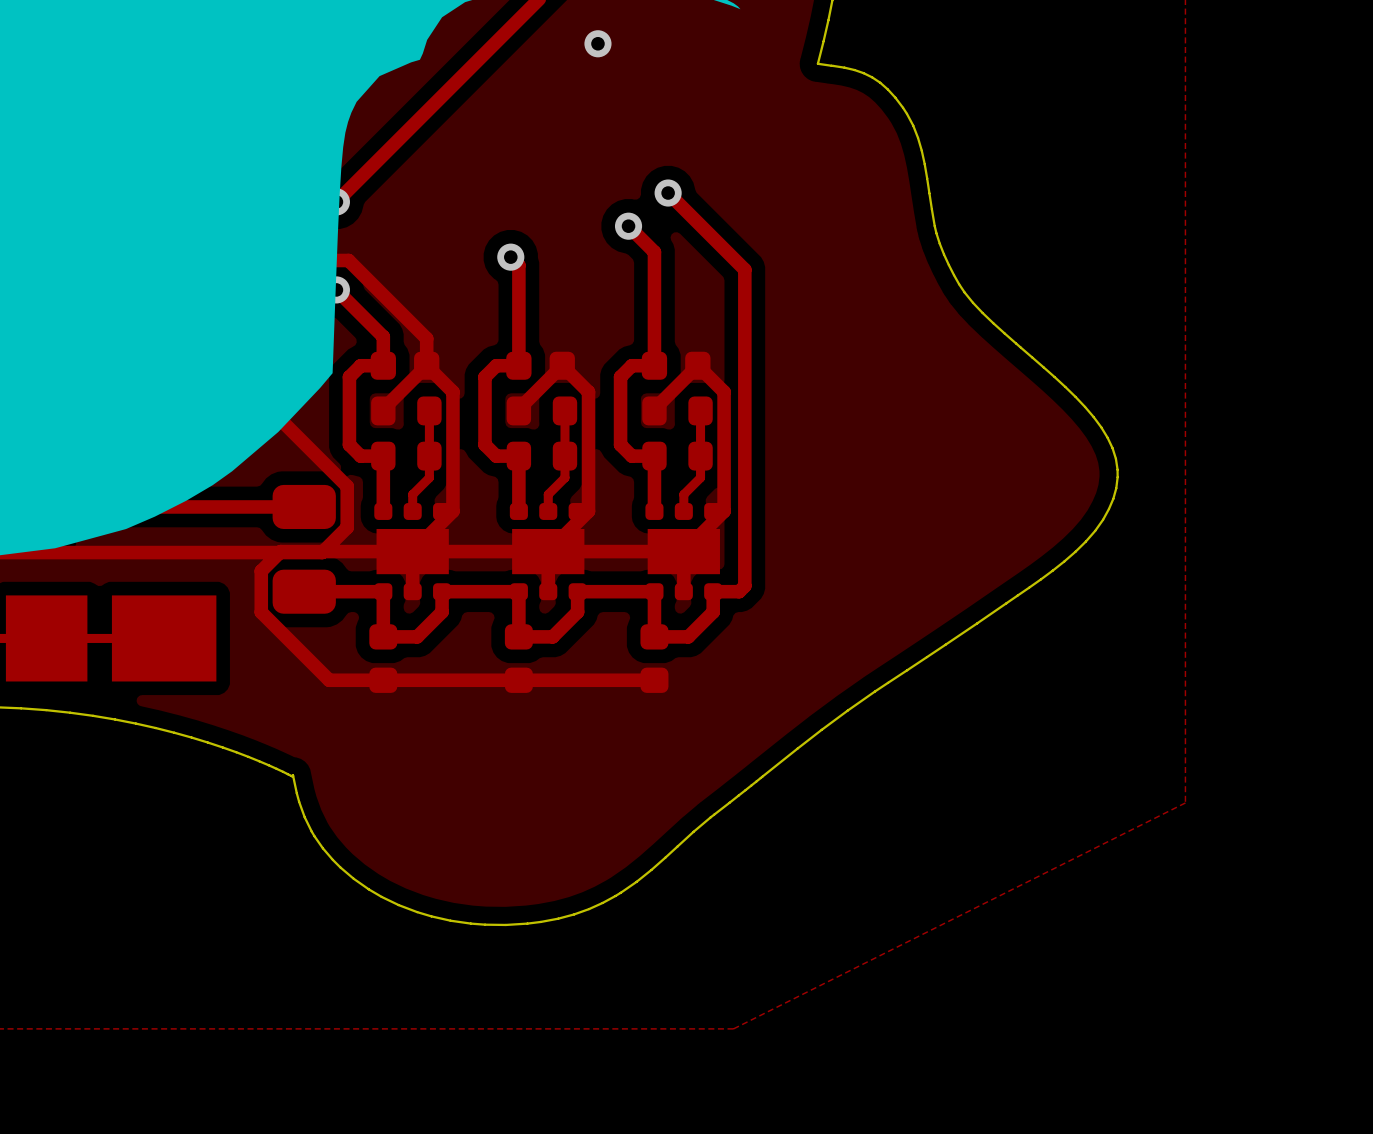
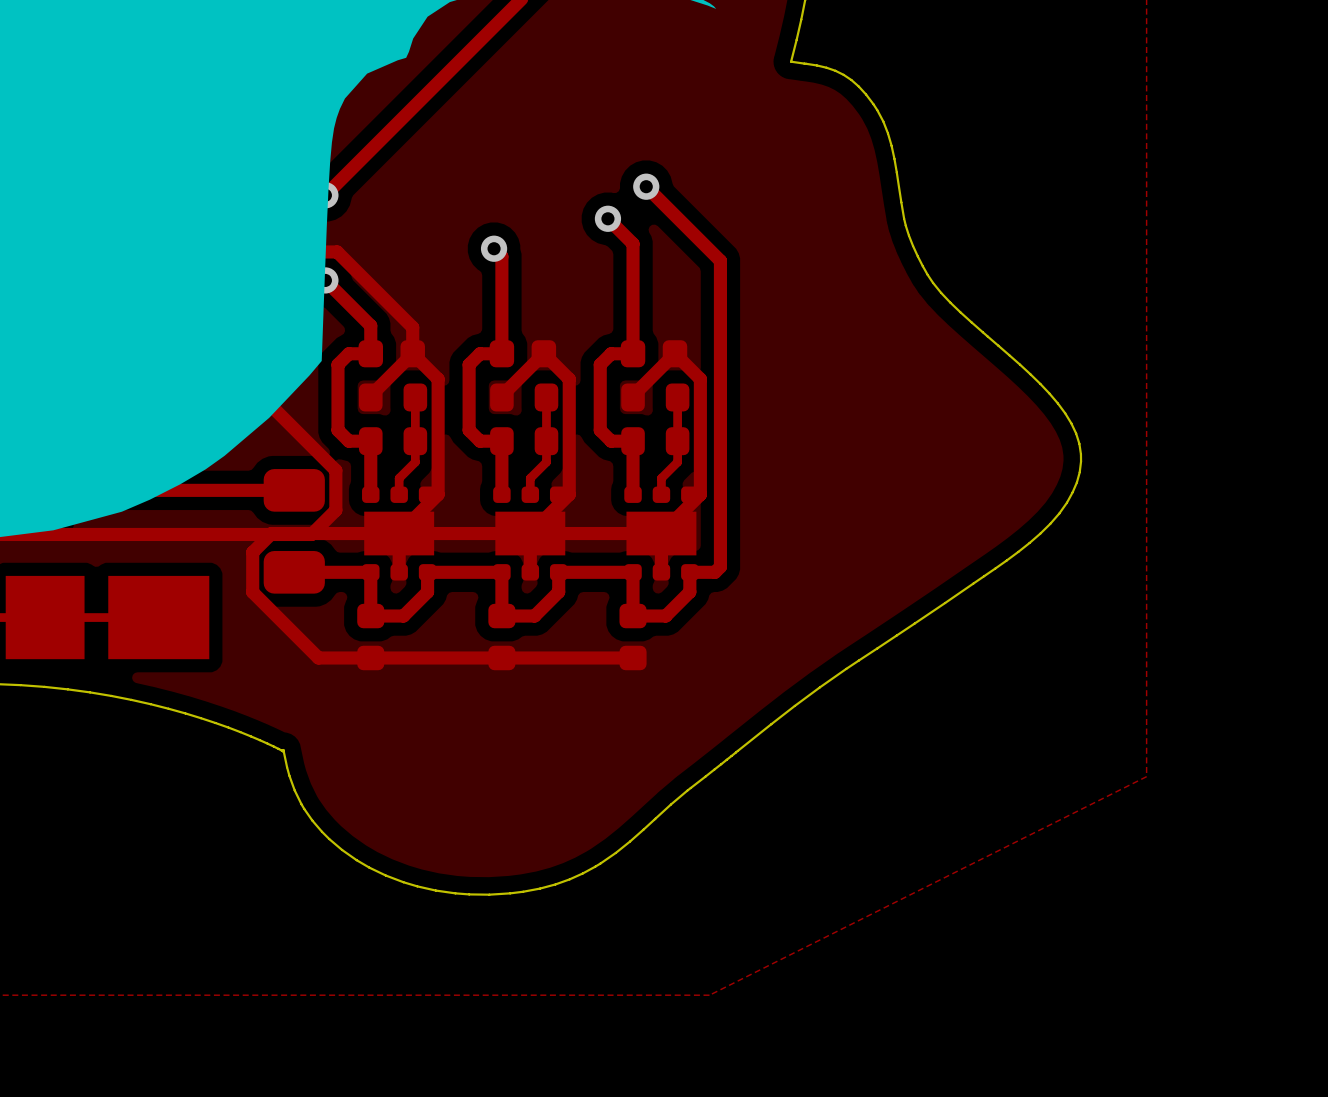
via: (597, 43) -> none

